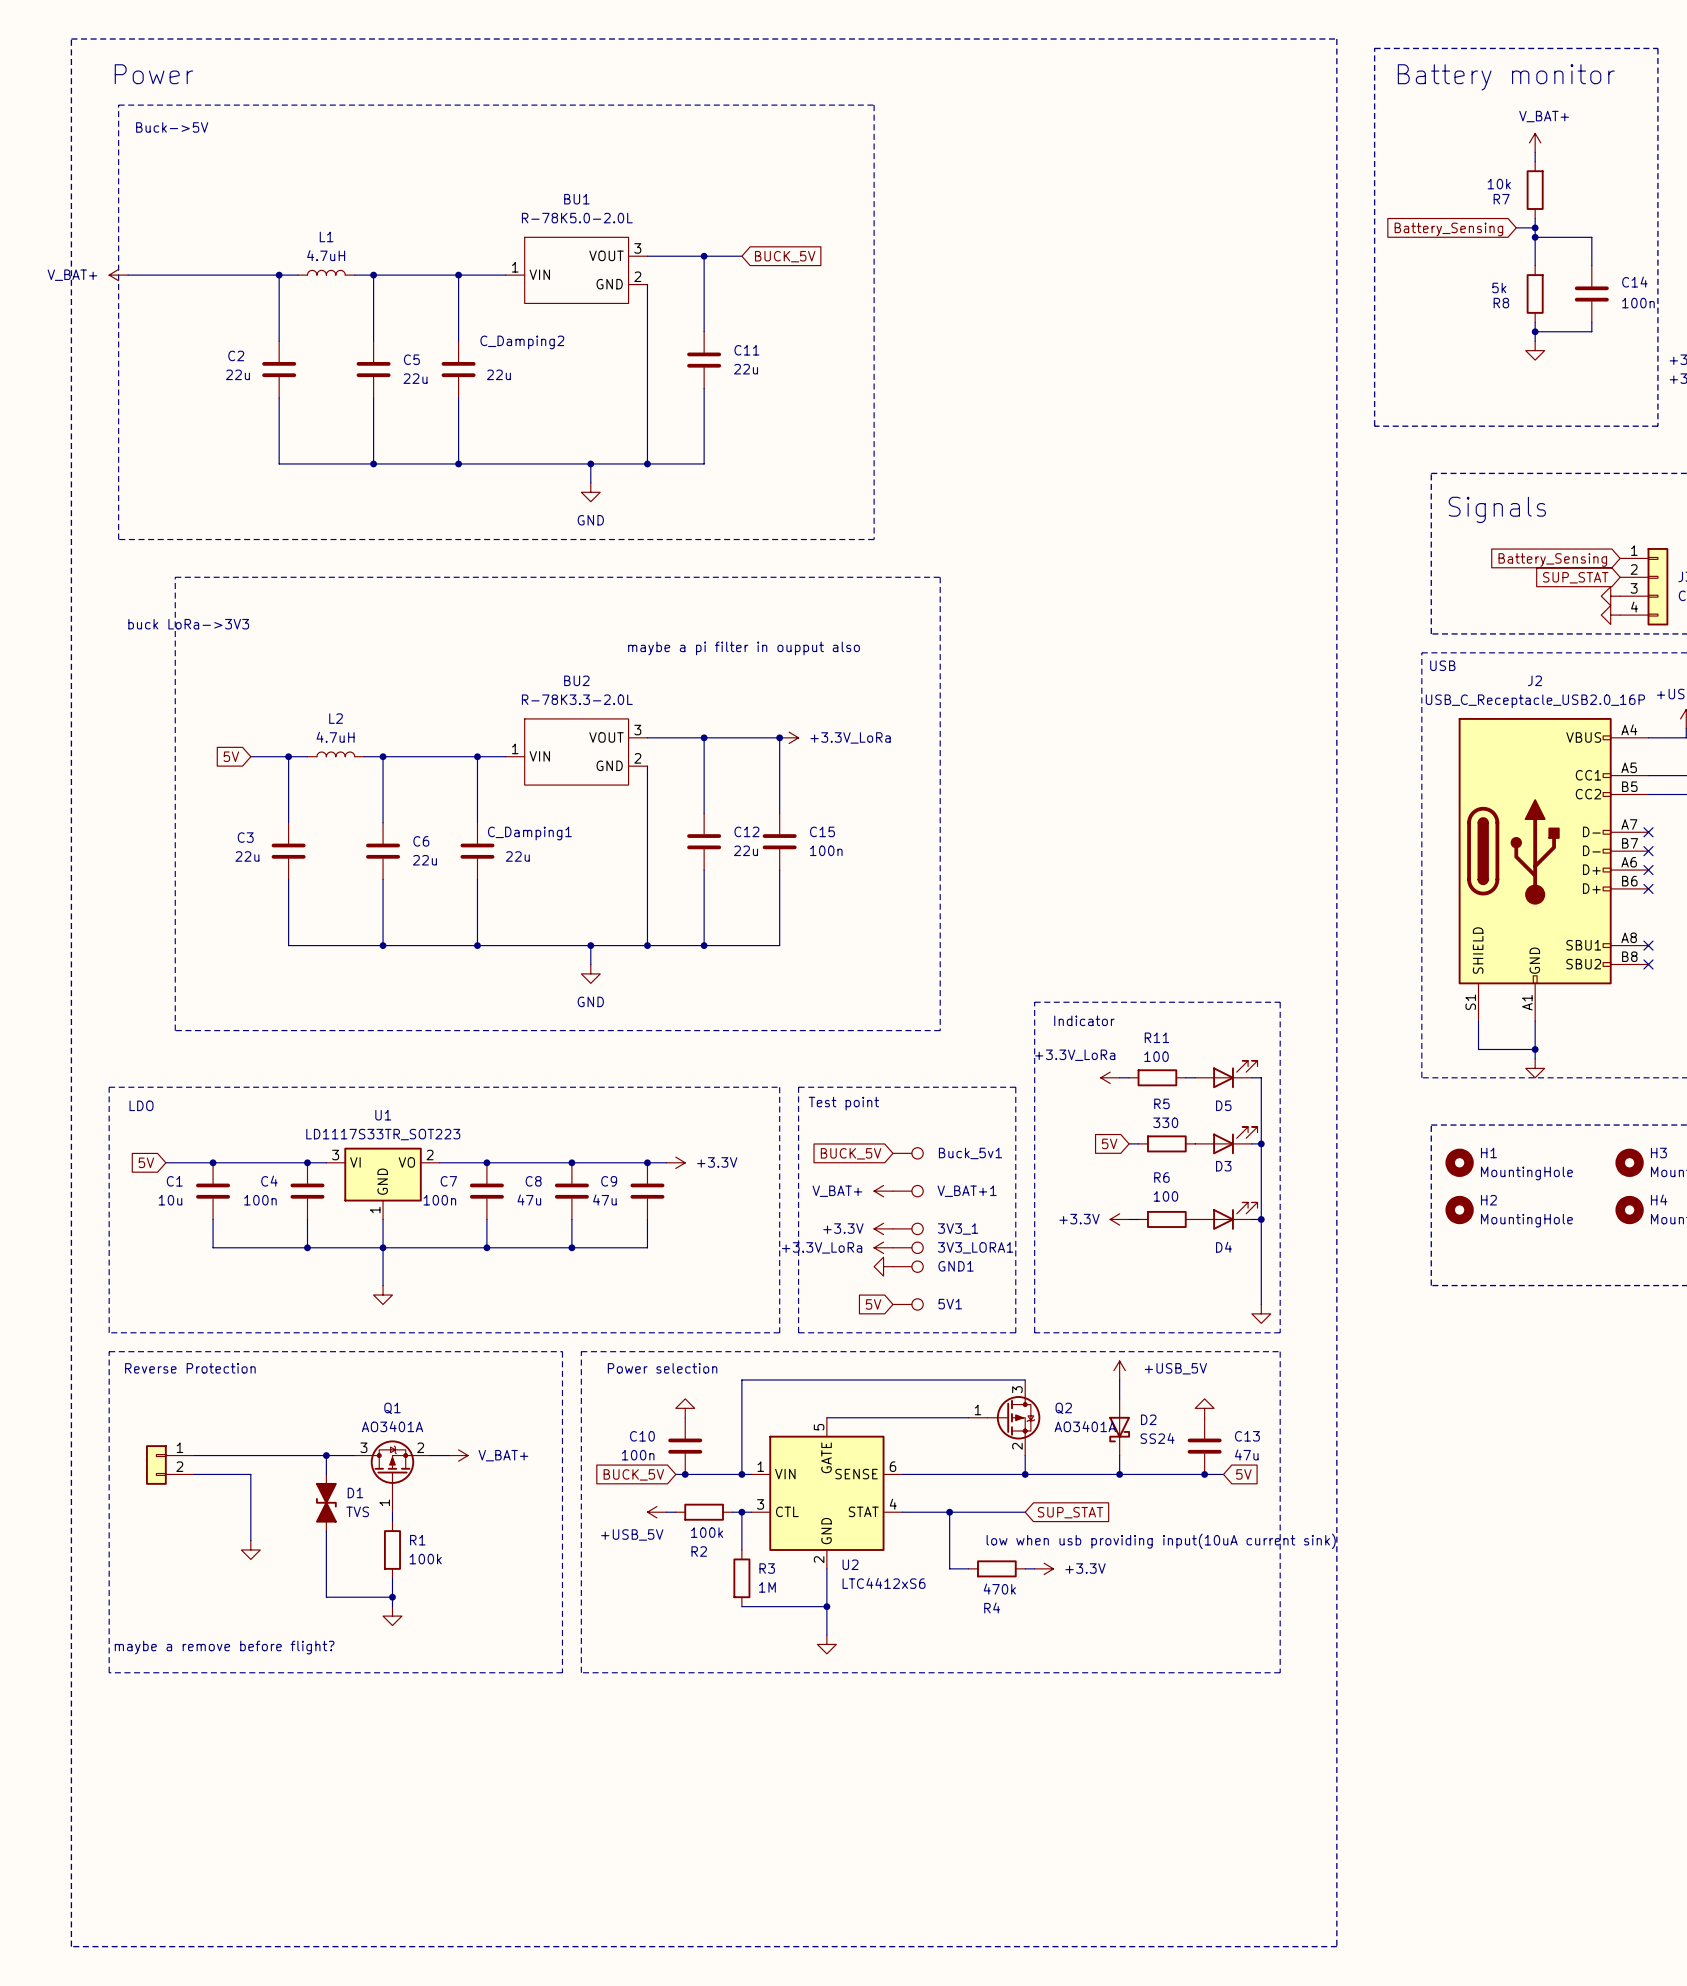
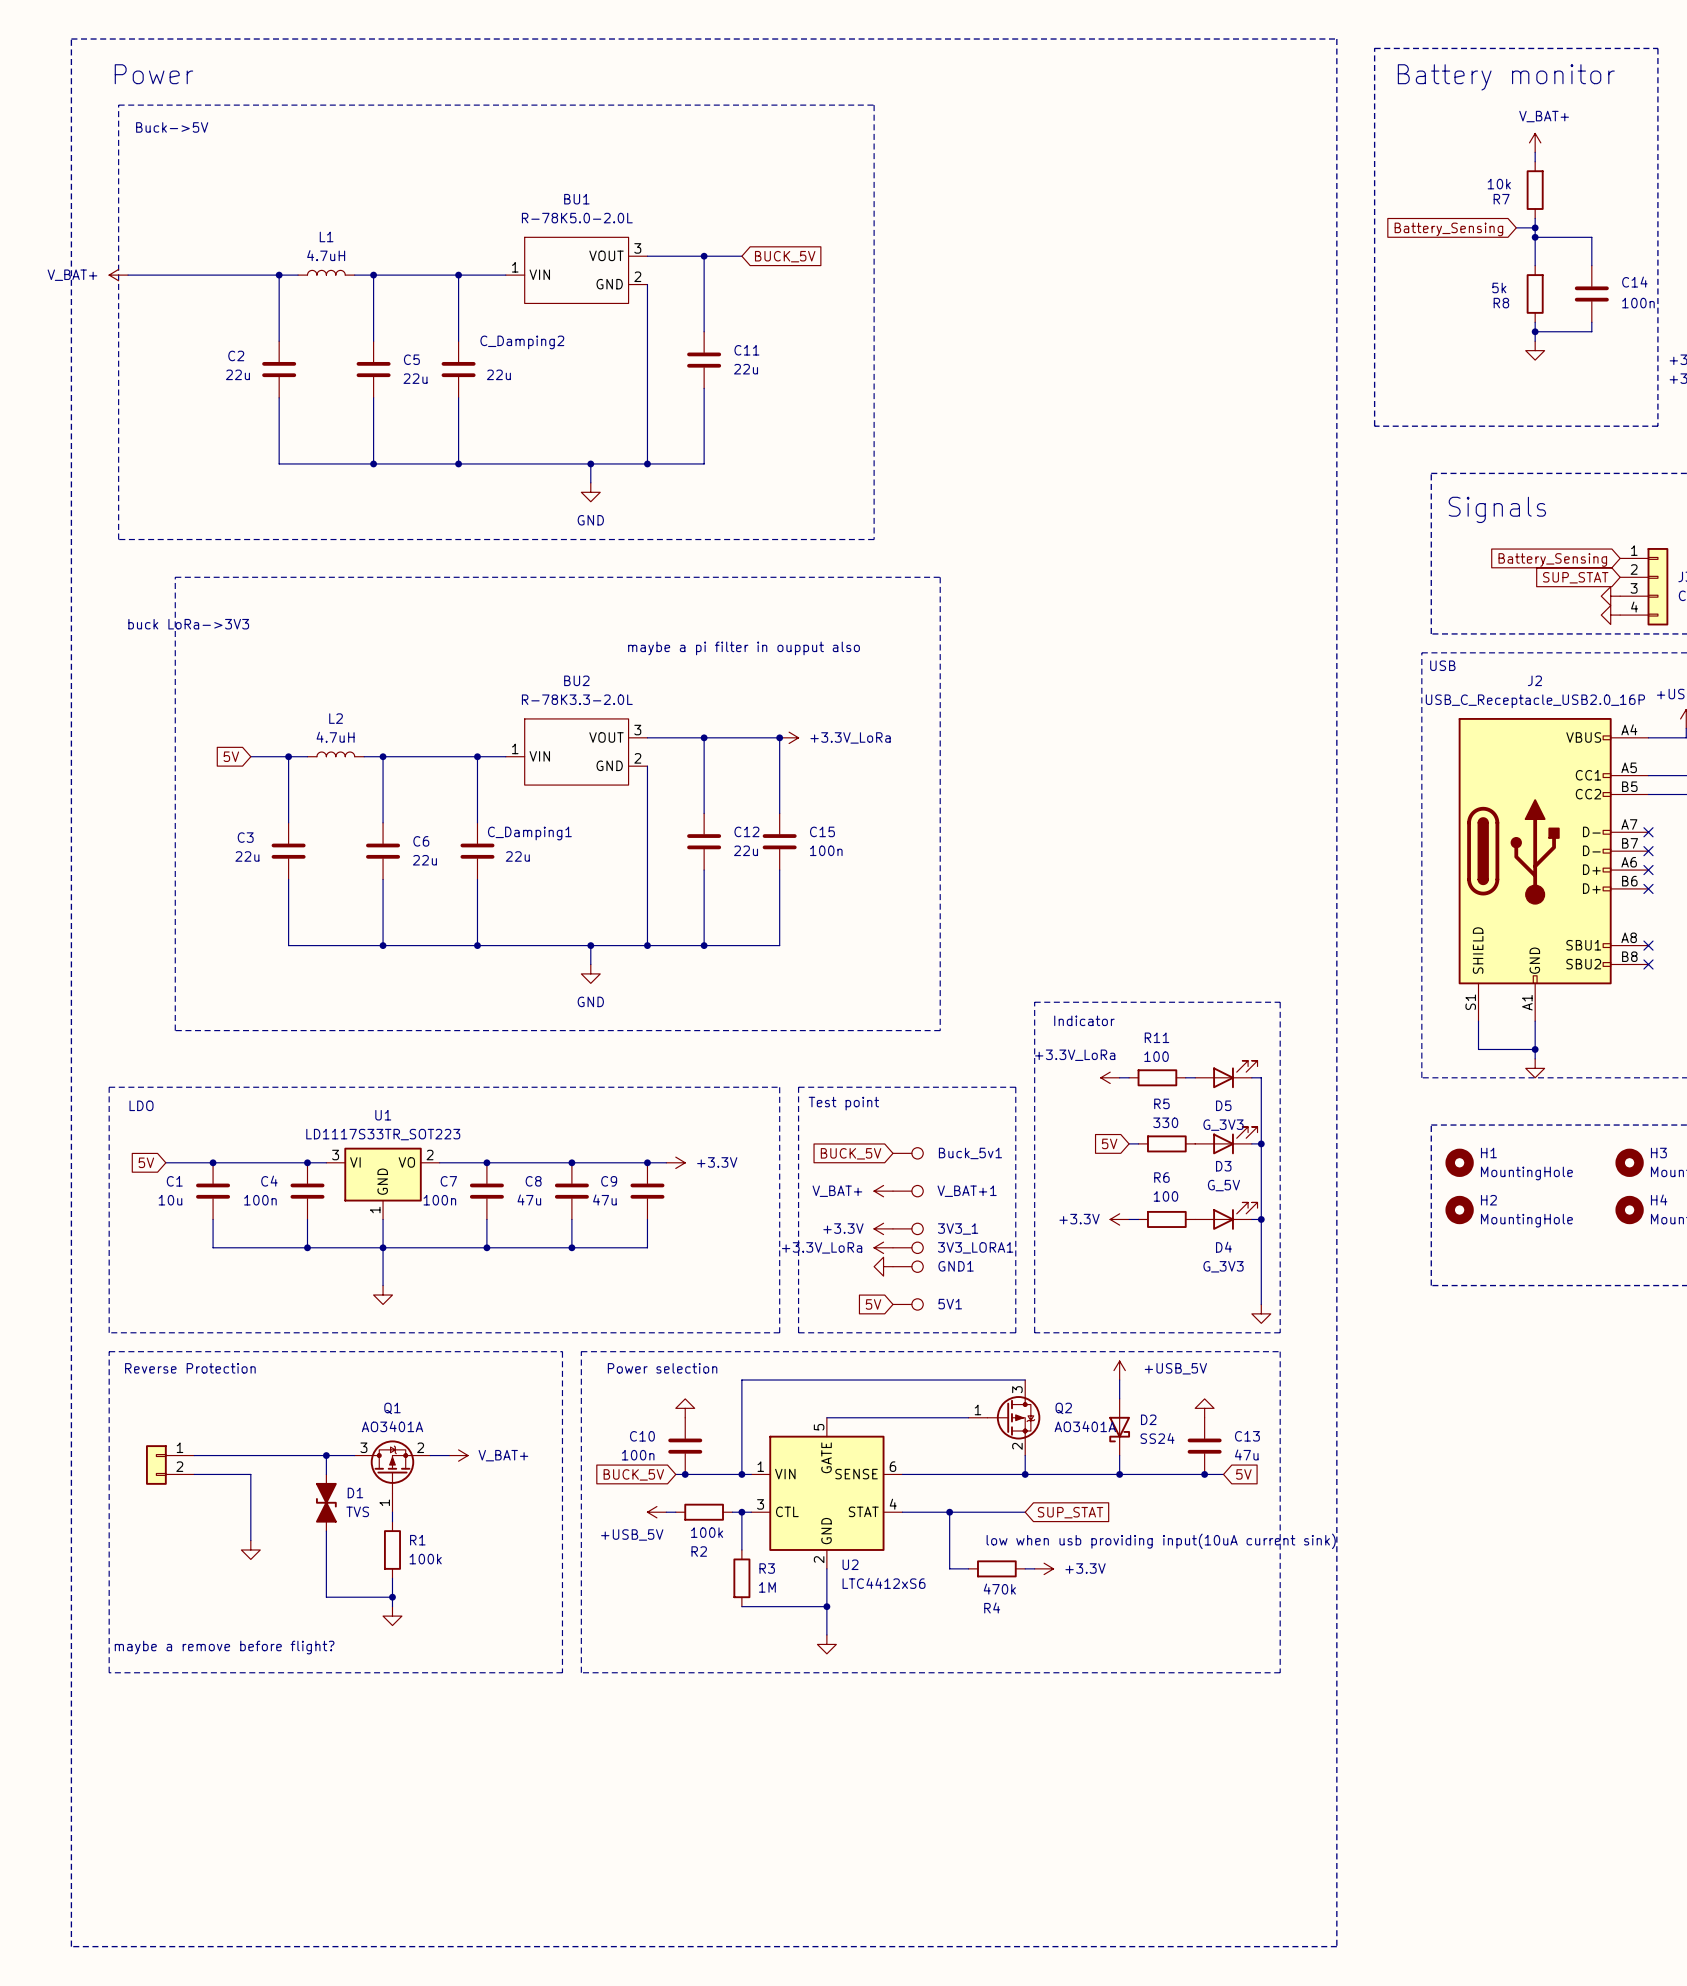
D5 value: none -> G_3V3 (1223, 1125)
D3 value: none -> G_5V (1223, 1185)
D4 value: none -> G_3V3 (1223, 1266)

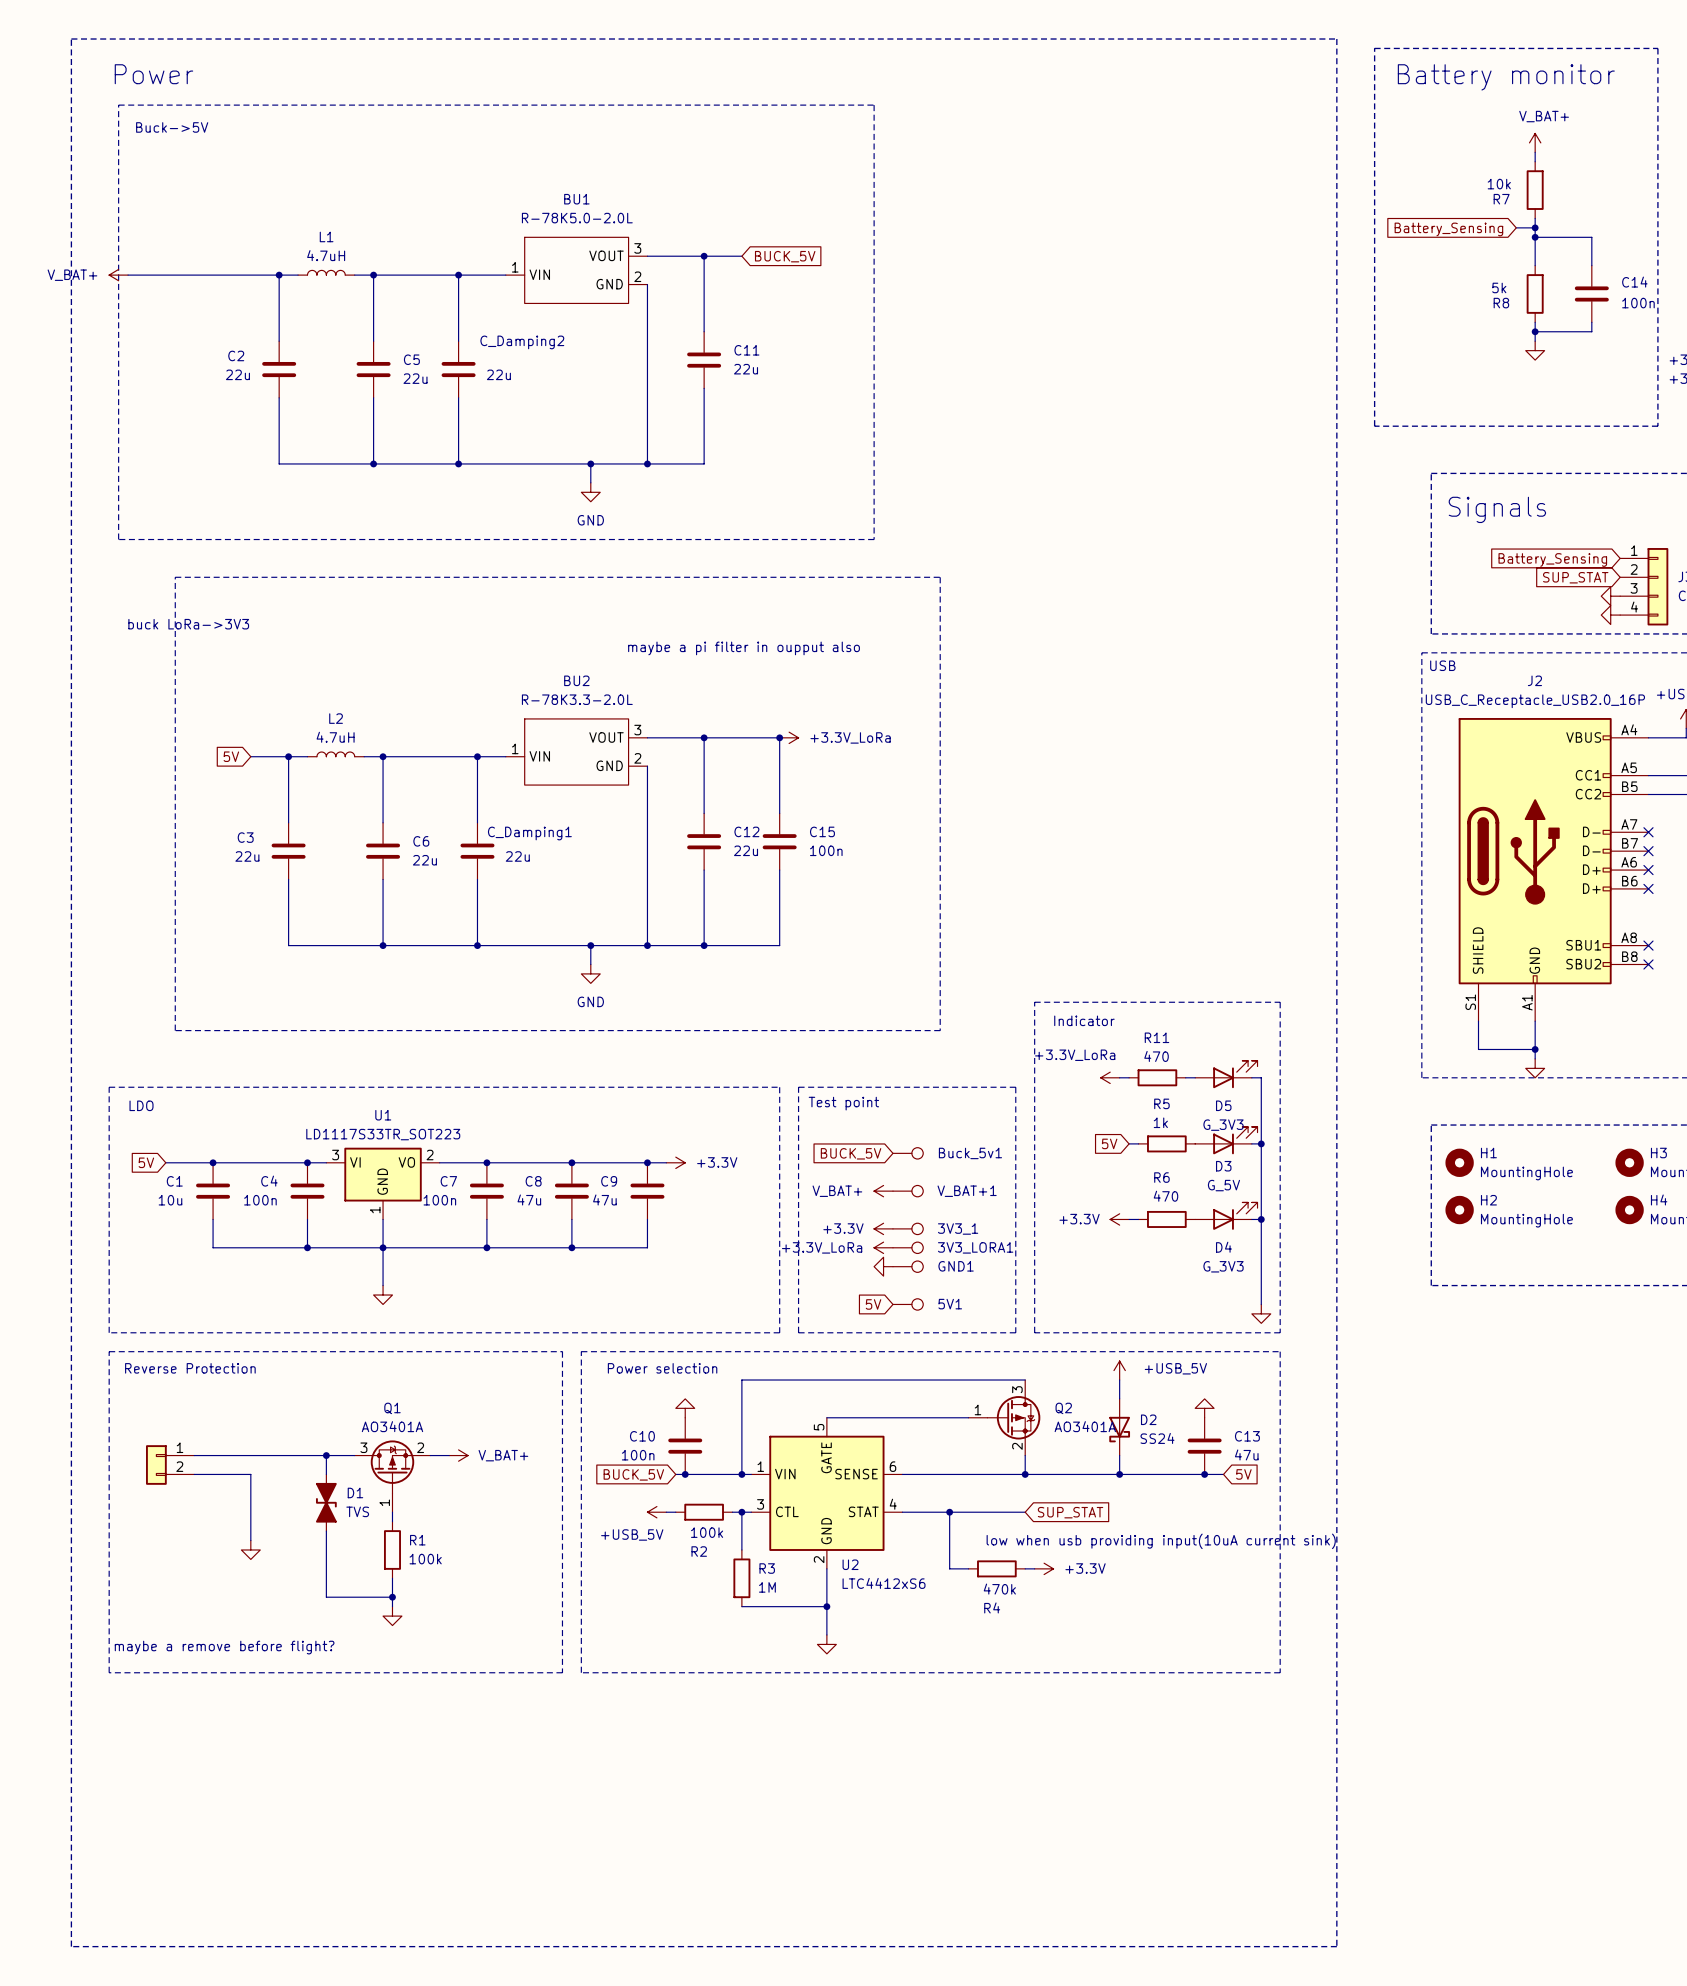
R11 value: 100 (1156, 1056) -> 470 (1156, 1056)
R5 value: 330 (1165, 1122) -> 1k (1160, 1122)
R6 value: 100 (1165, 1196) -> 470 (1165, 1196)

